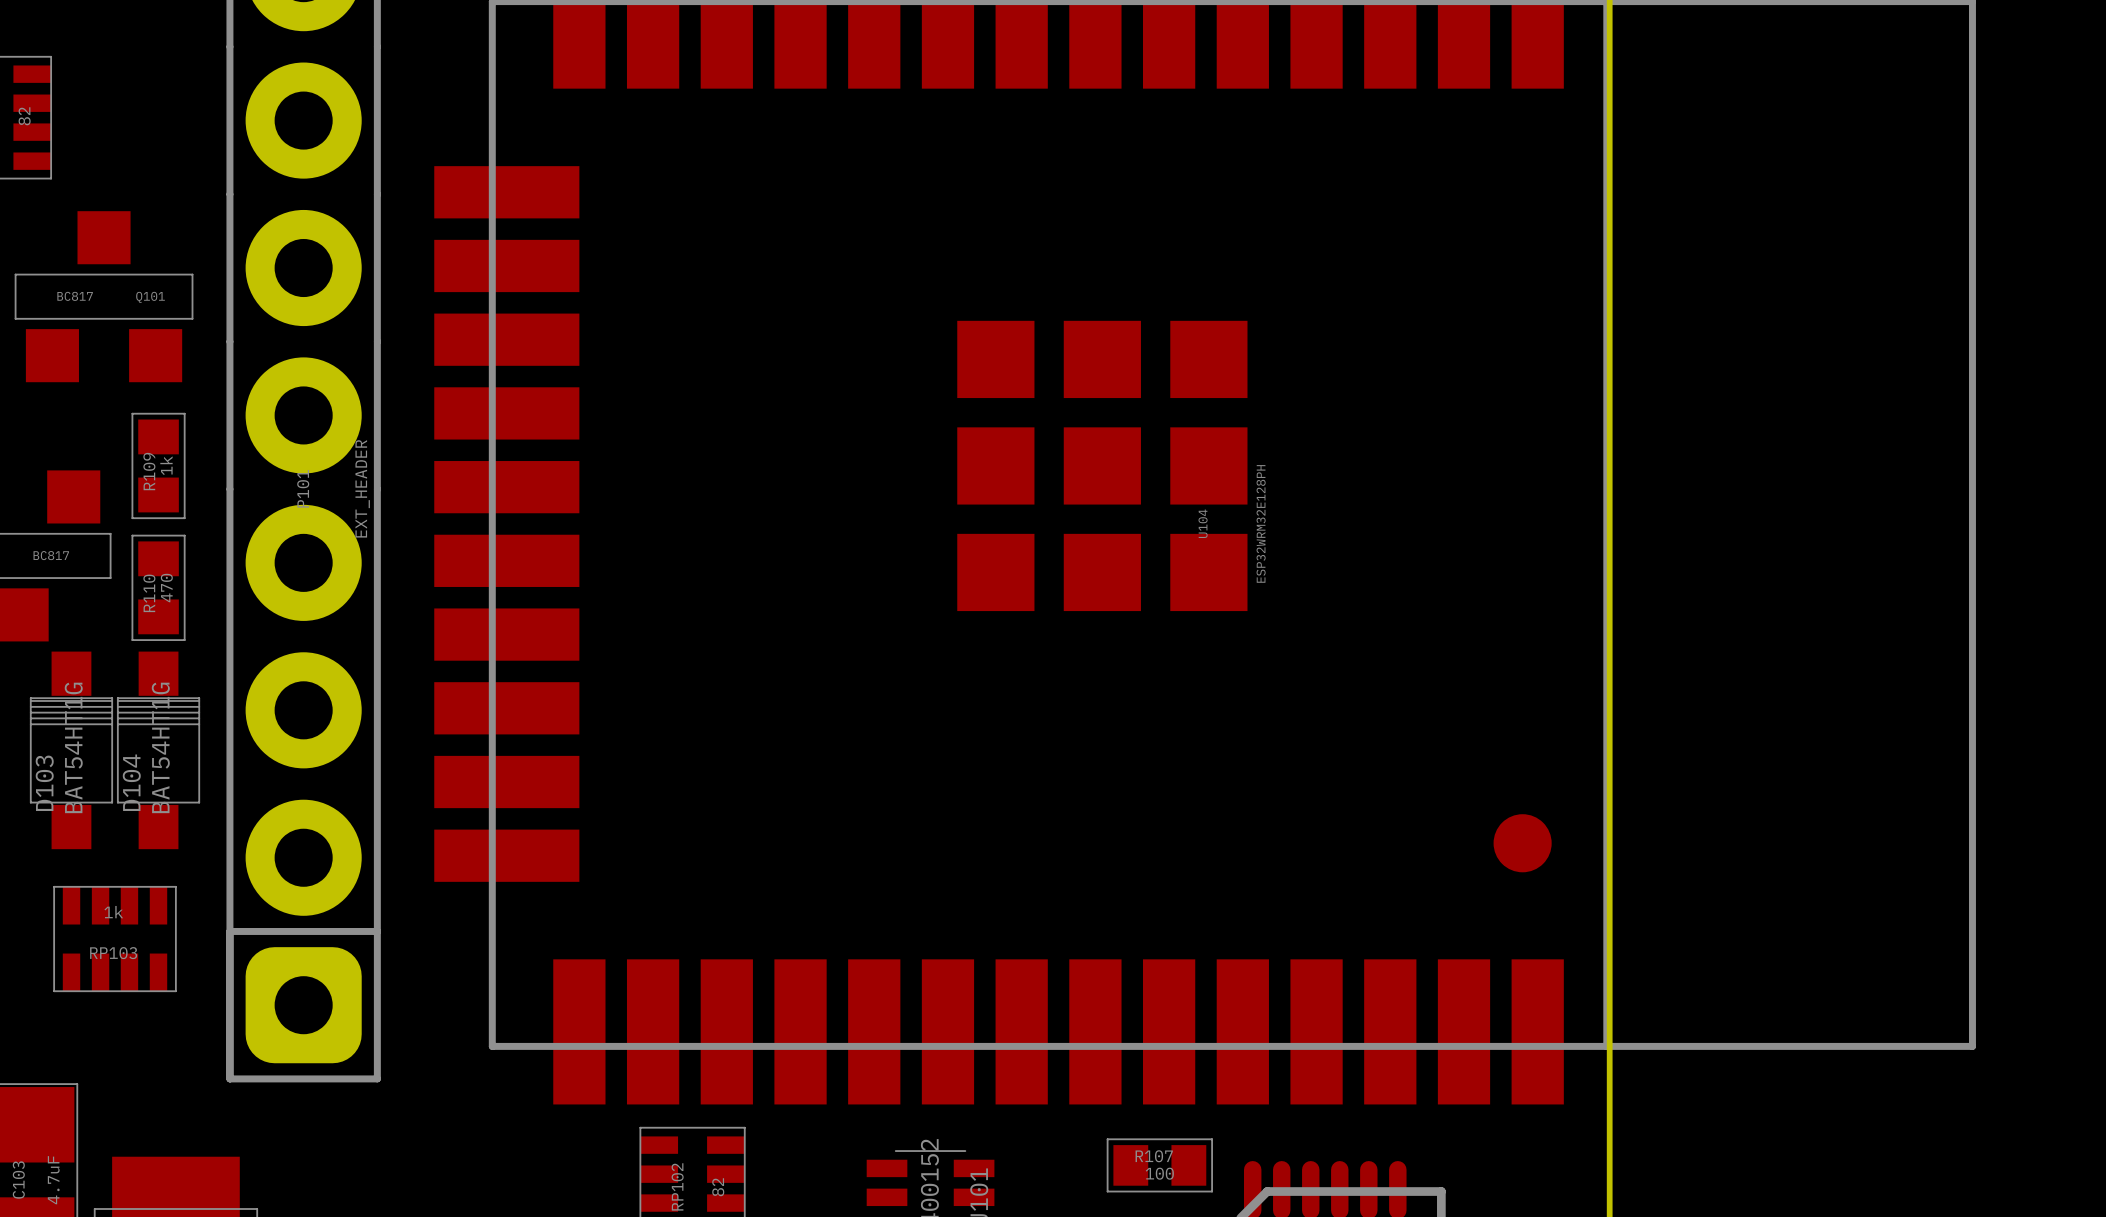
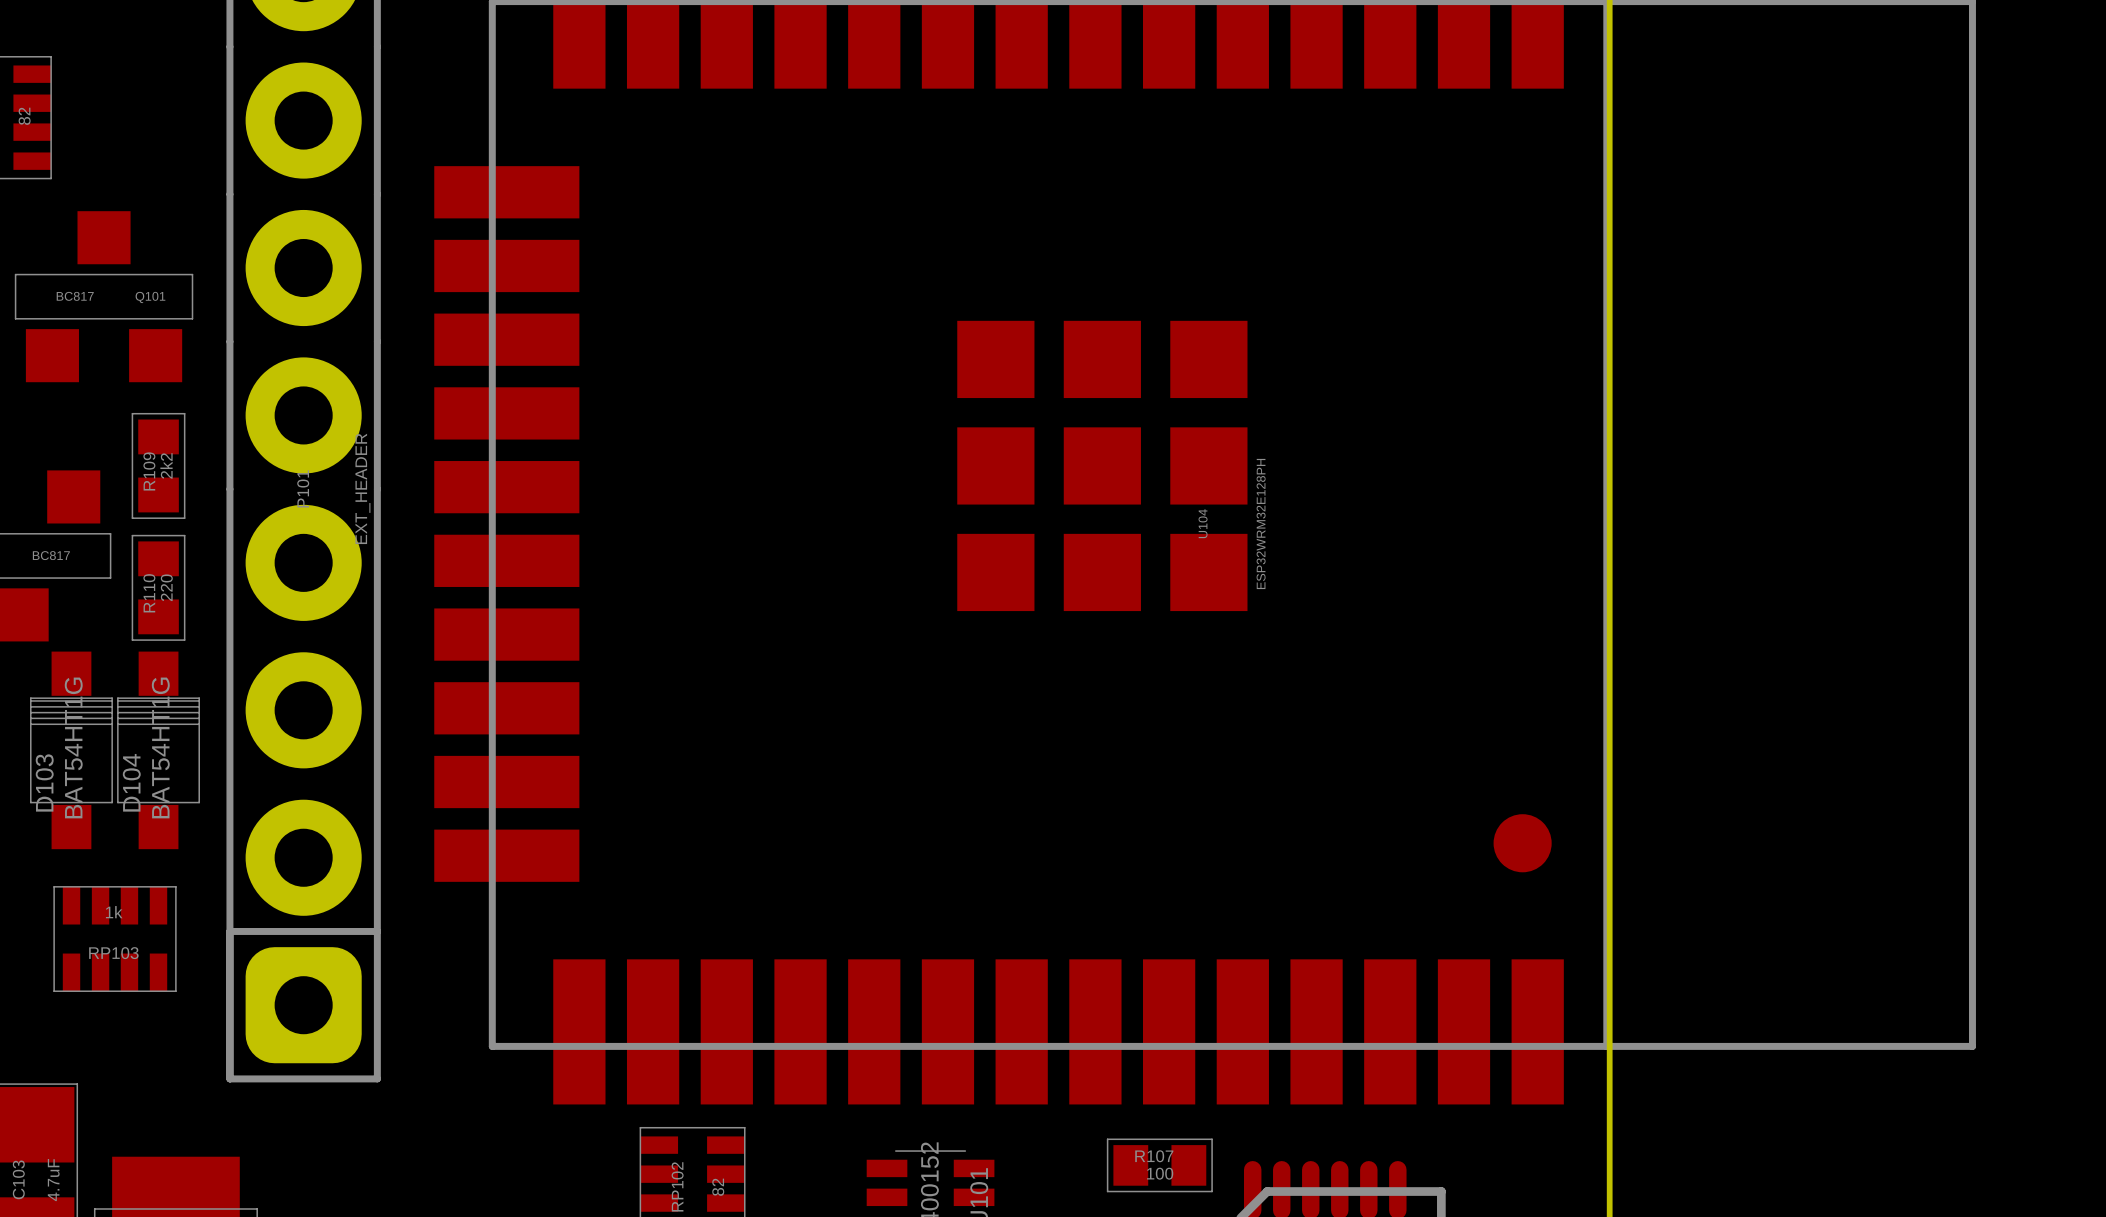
R109 value: 1k (166, 465) -> 2k2 (166, 465)
R110 value: 470 (166, 588) -> 220 (166, 587)

